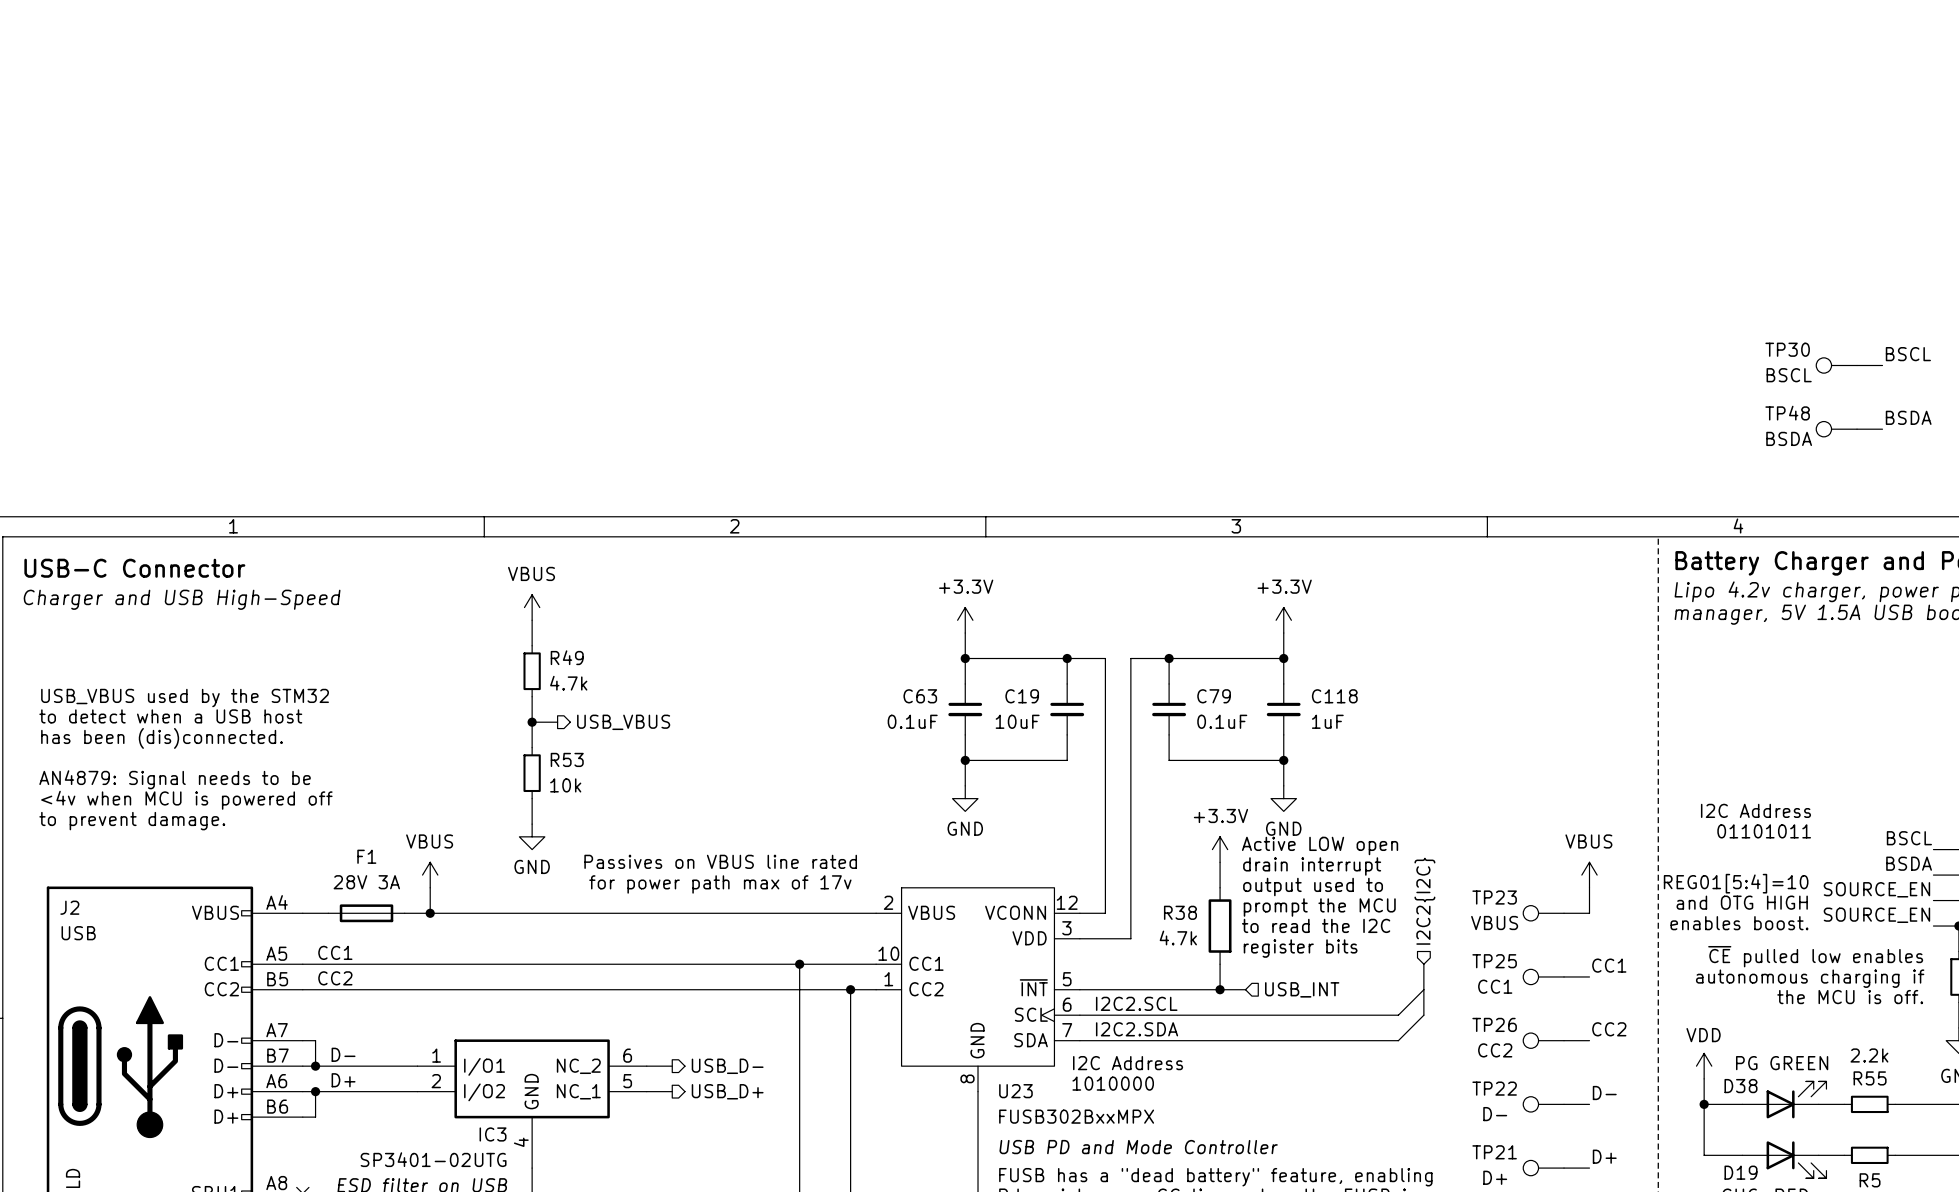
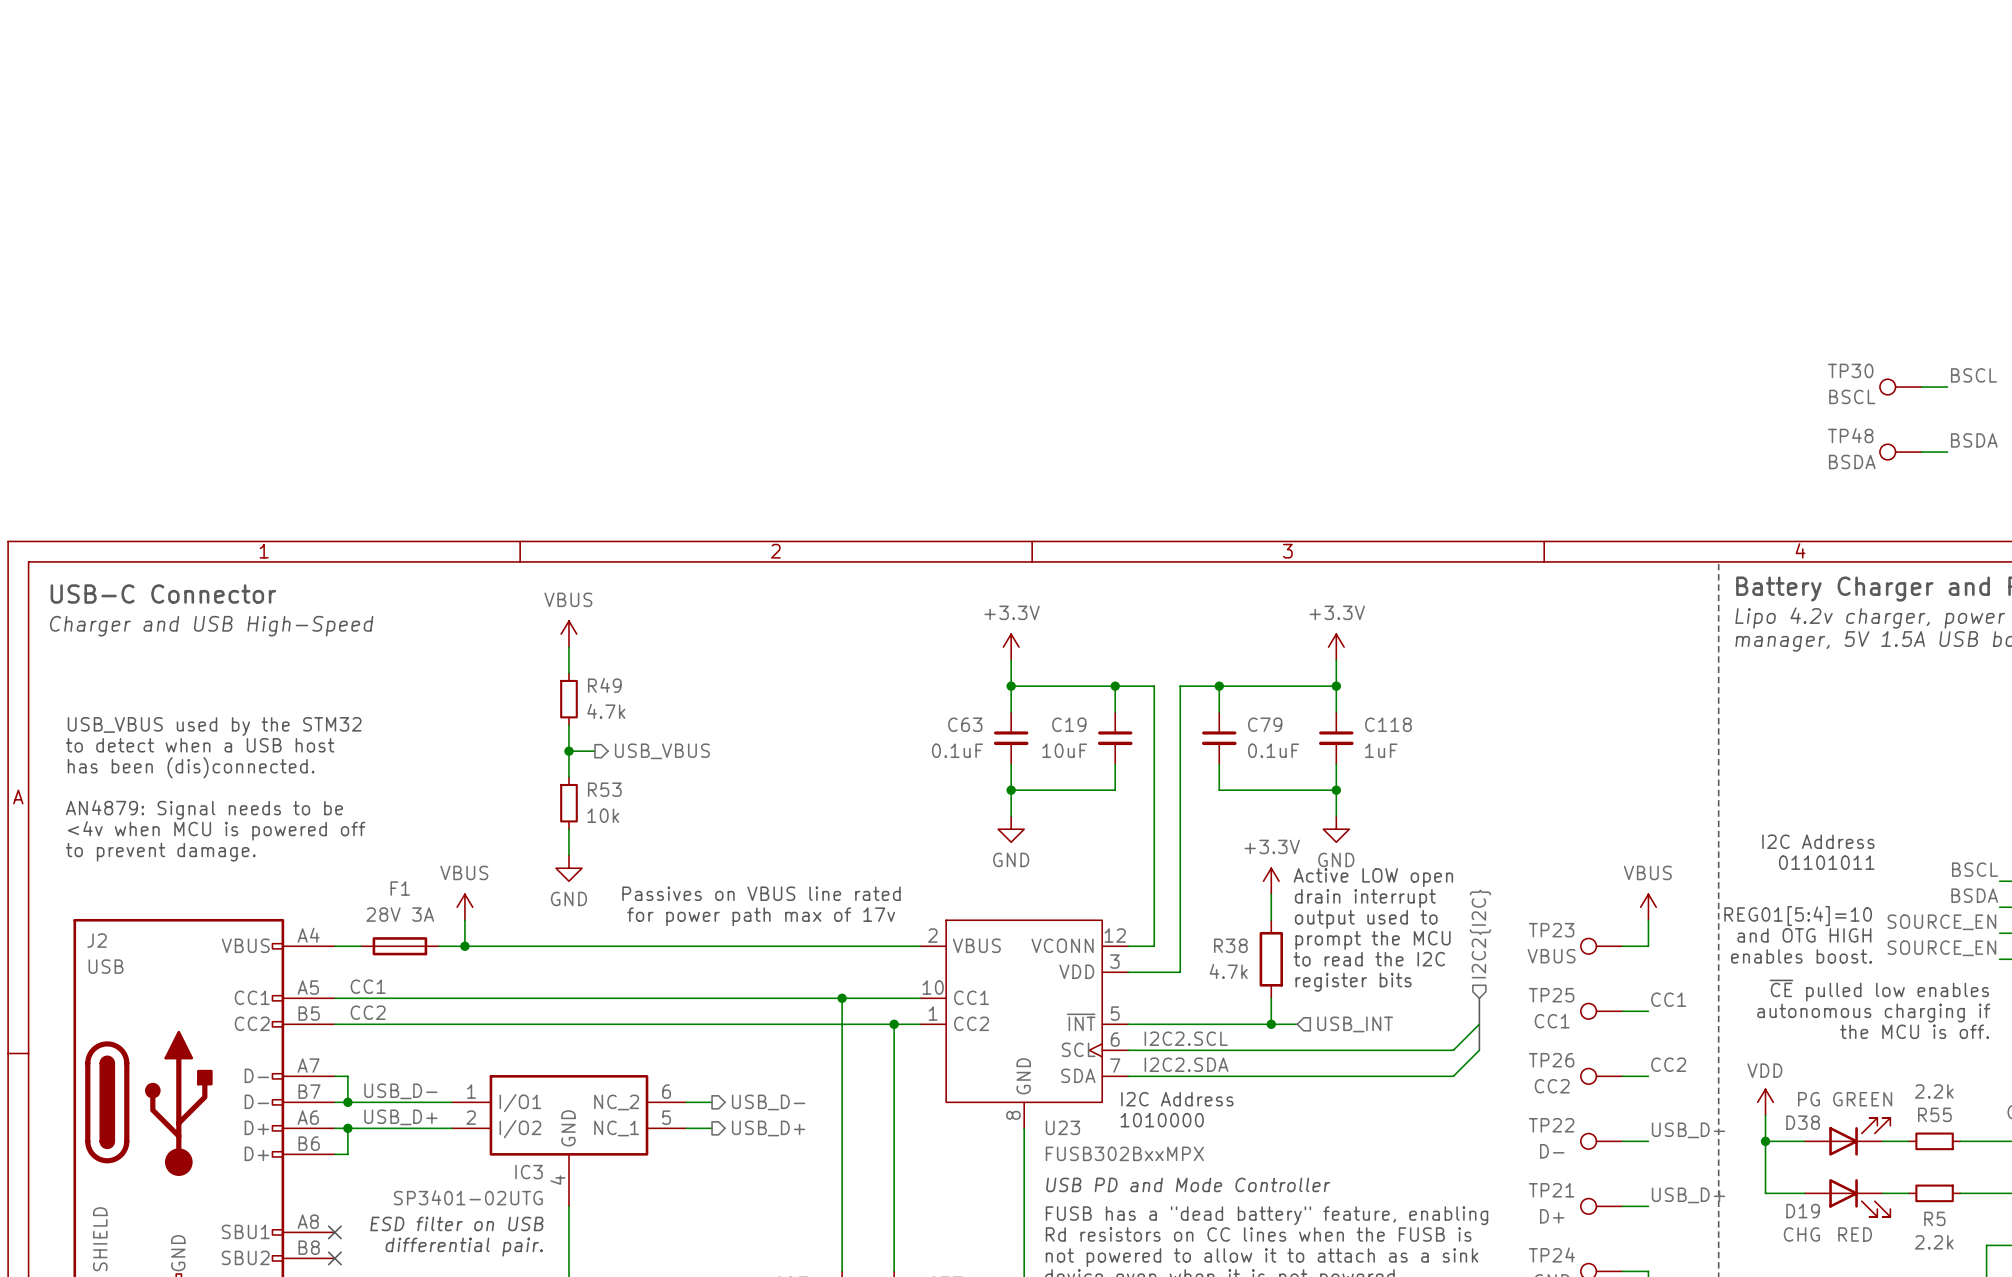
label: D- (343, 1054) -> USB_D- (400, 1091)
label: D+ (343, 1080) -> USB_D+ (400, 1117)
label: D- (1604, 1093) -> USB_D- (1688, 1130)
label: D+ (1604, 1156) -> USB_D+ (1688, 1195)

